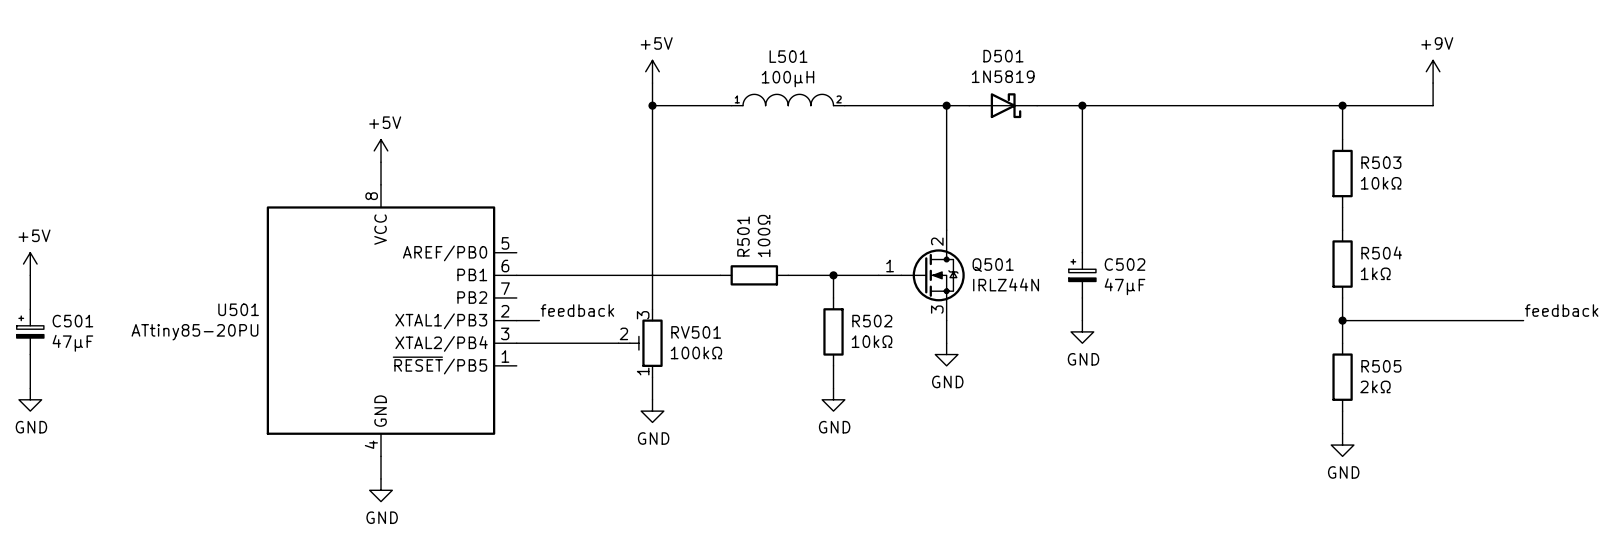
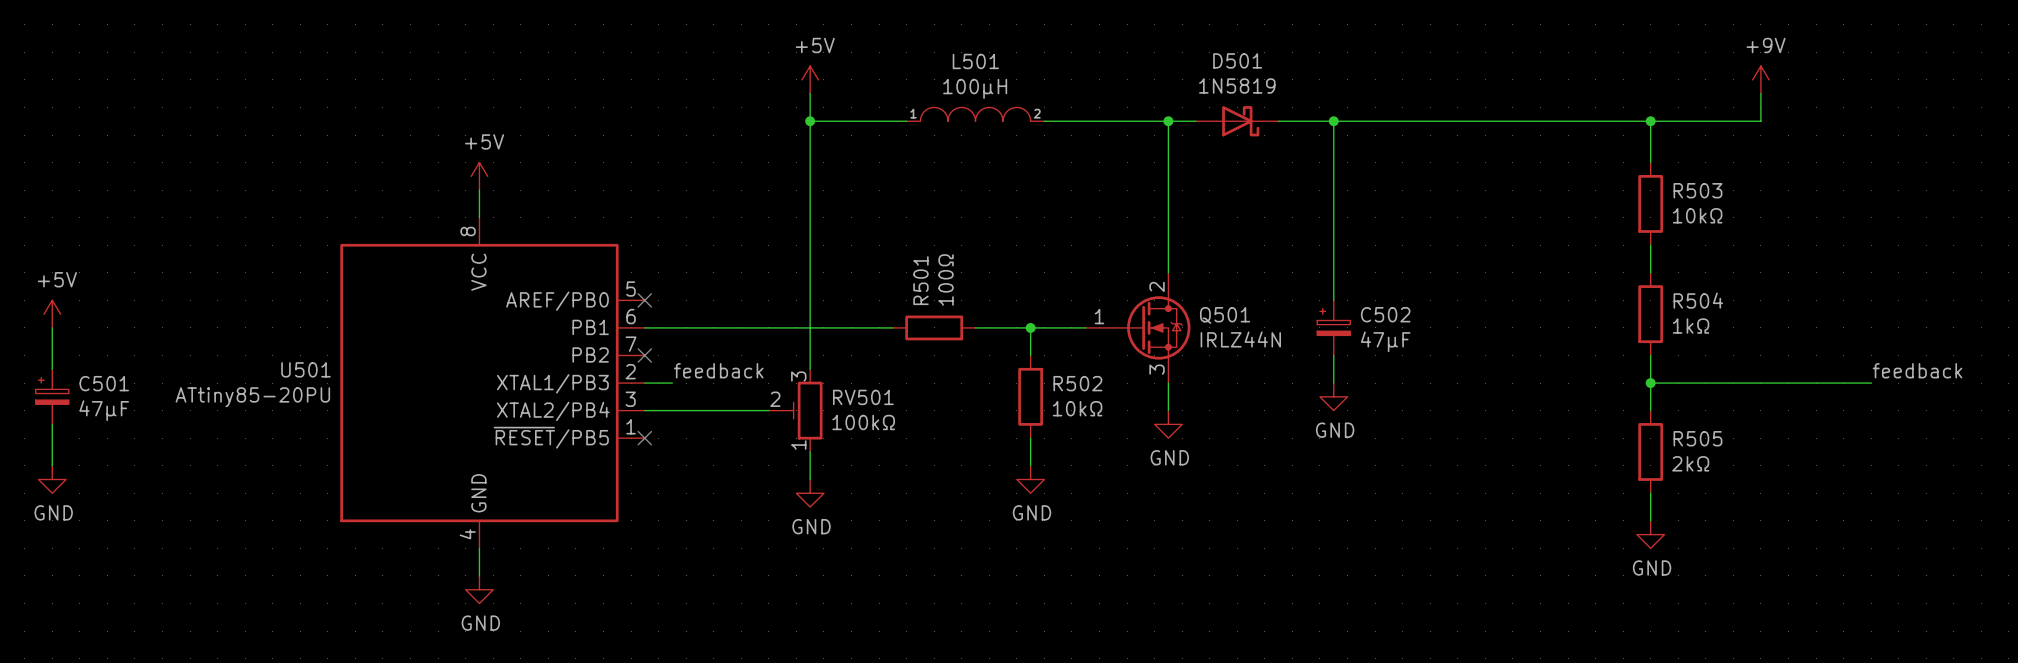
no-connect mark: none -> (644, 300)
no-connect mark: none -> (644, 355)
no-connect mark: none -> (644, 438)

